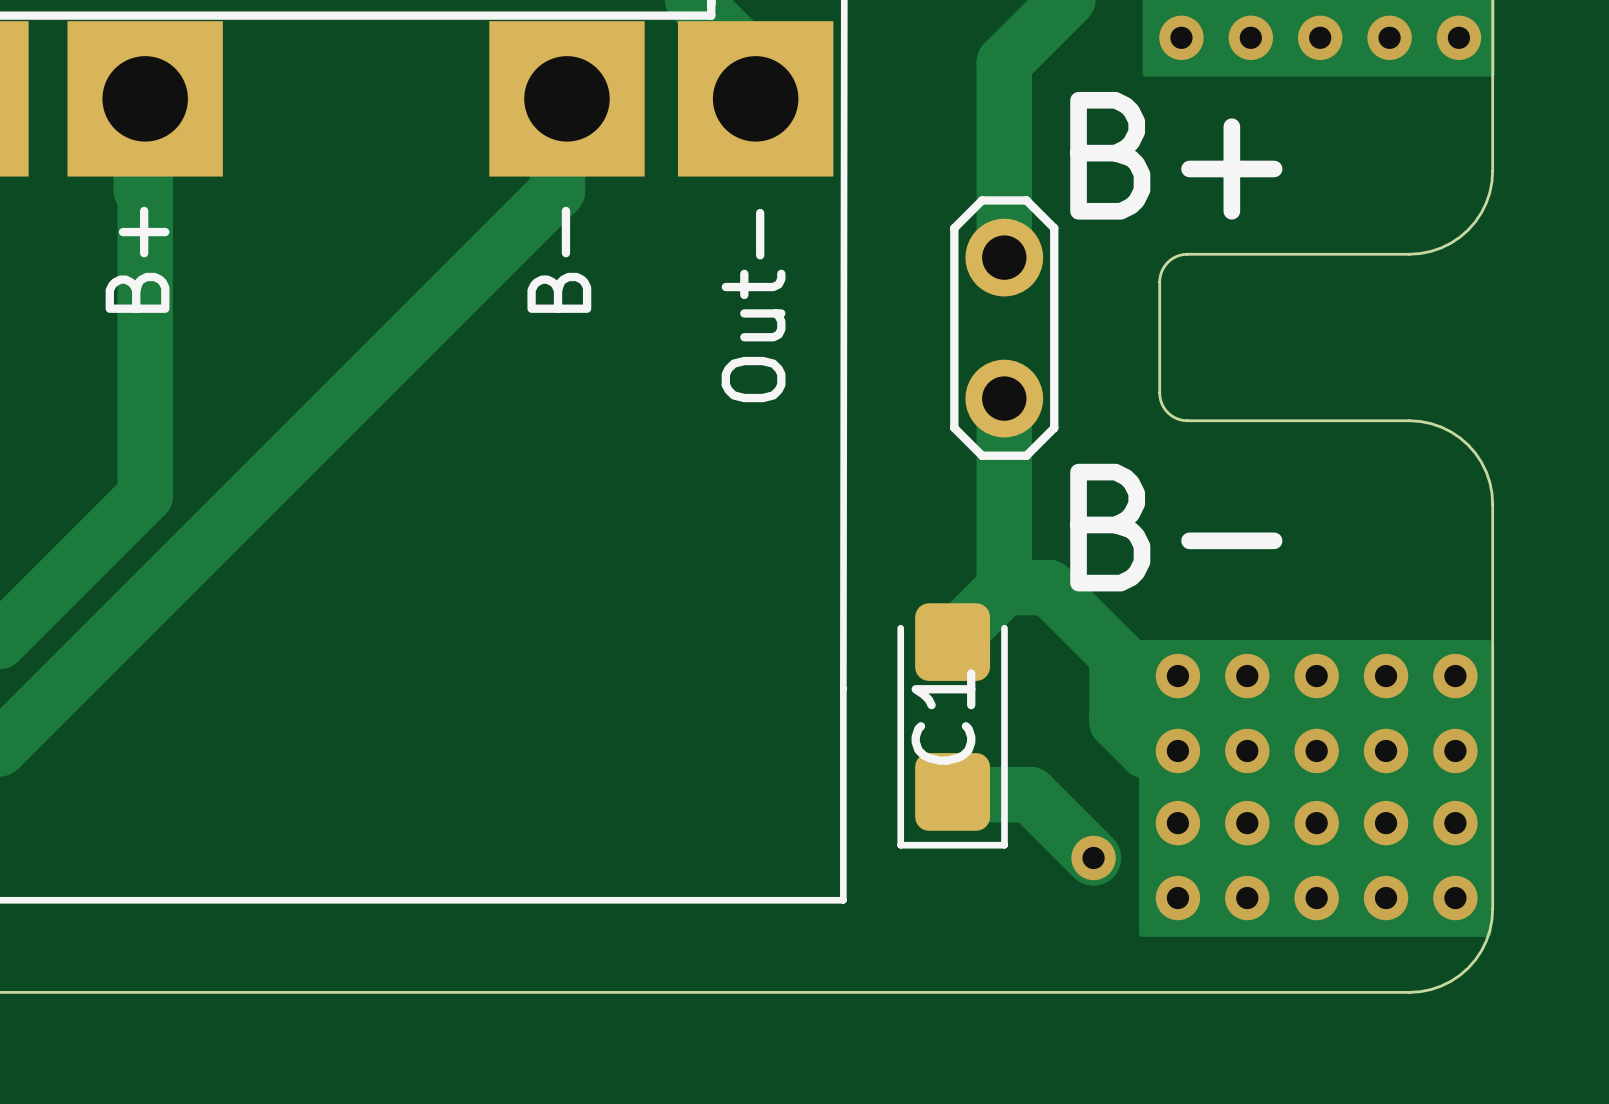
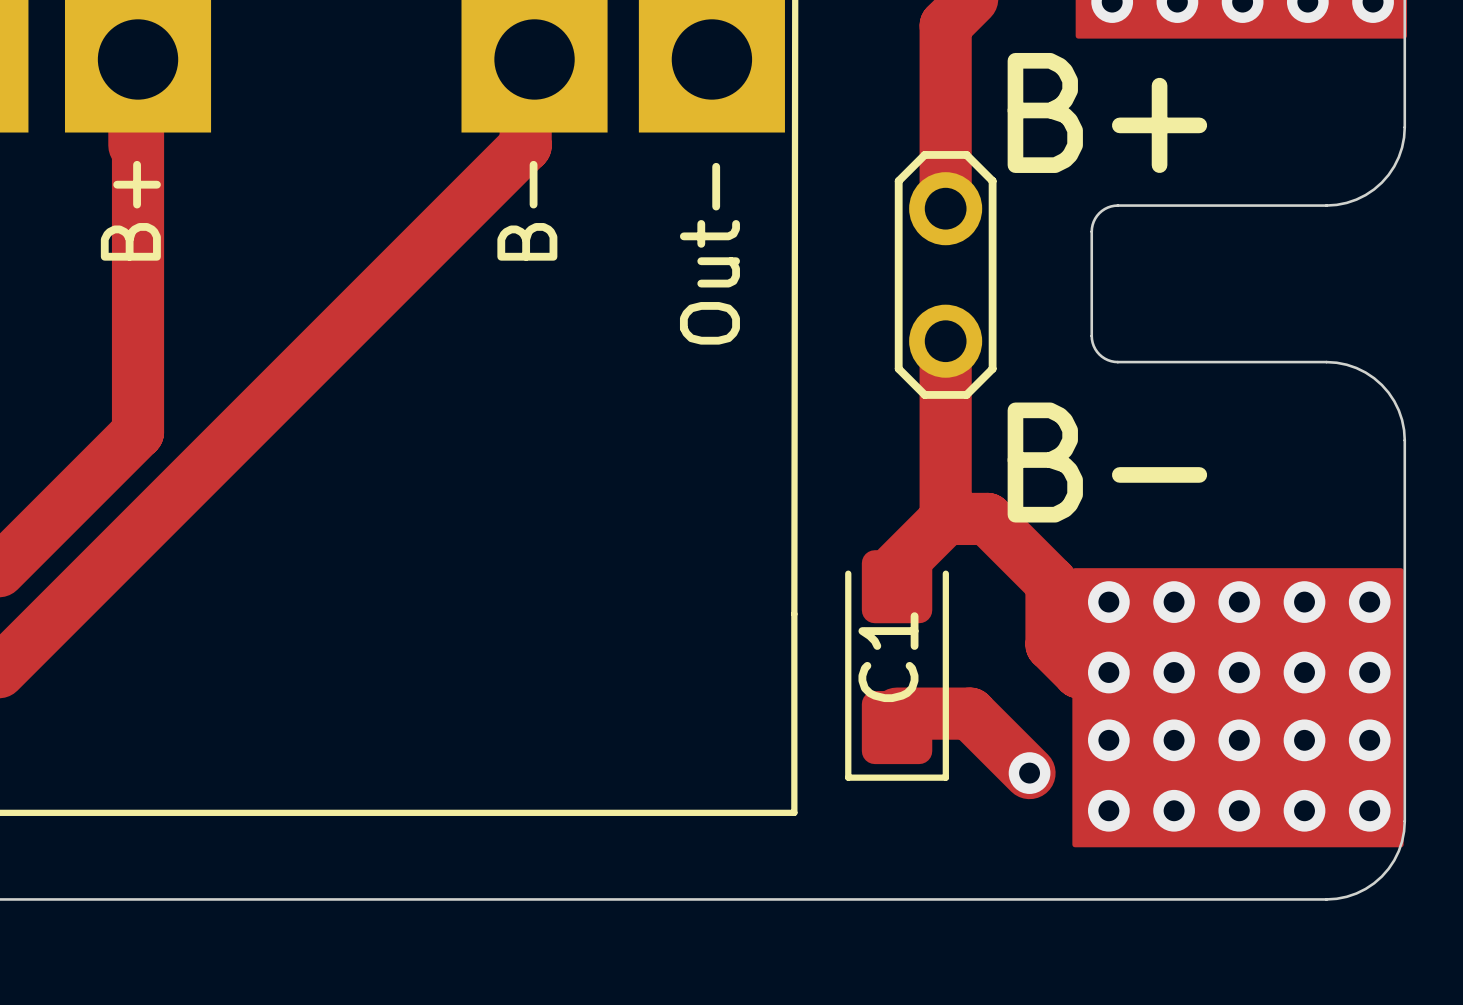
C1 position: (952, 725) -> (897, 665)

